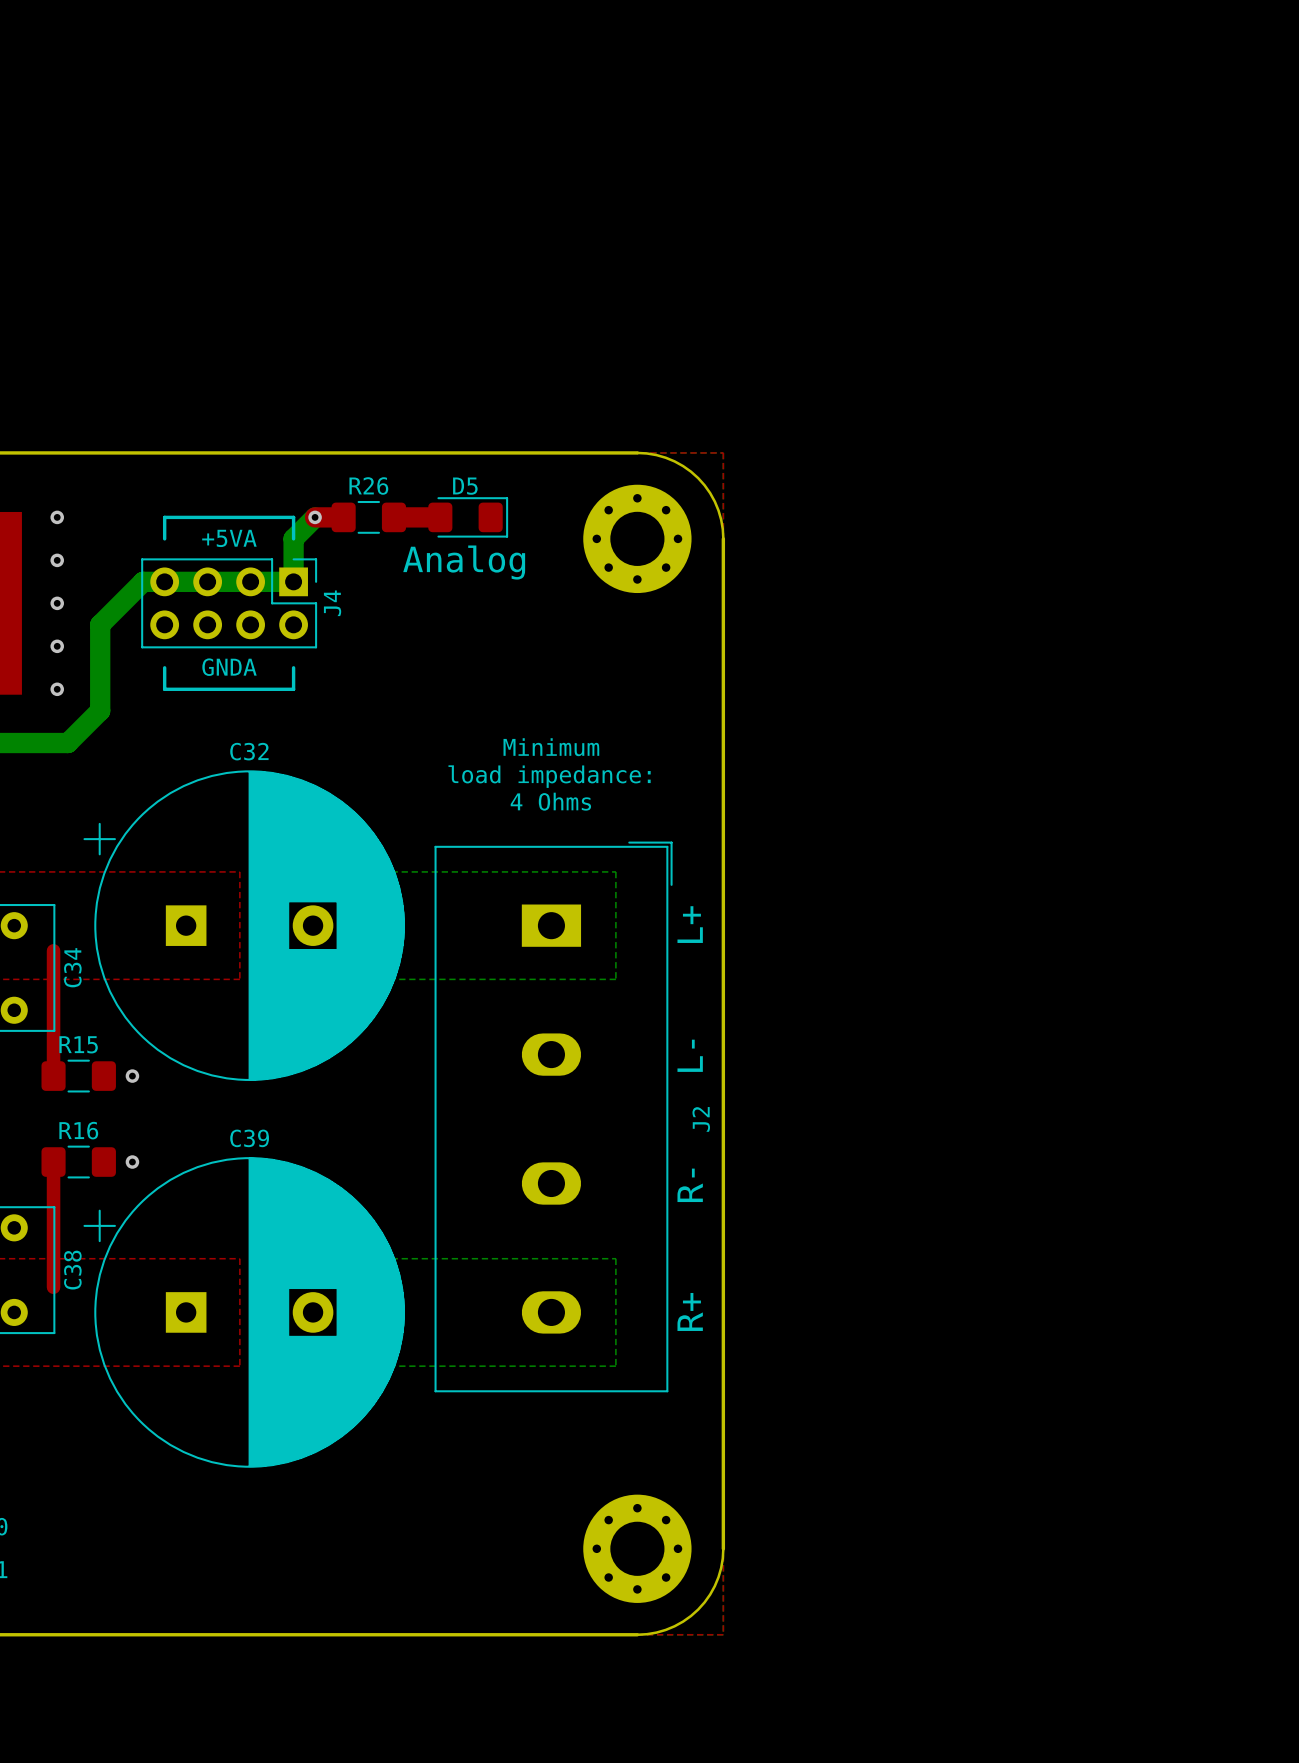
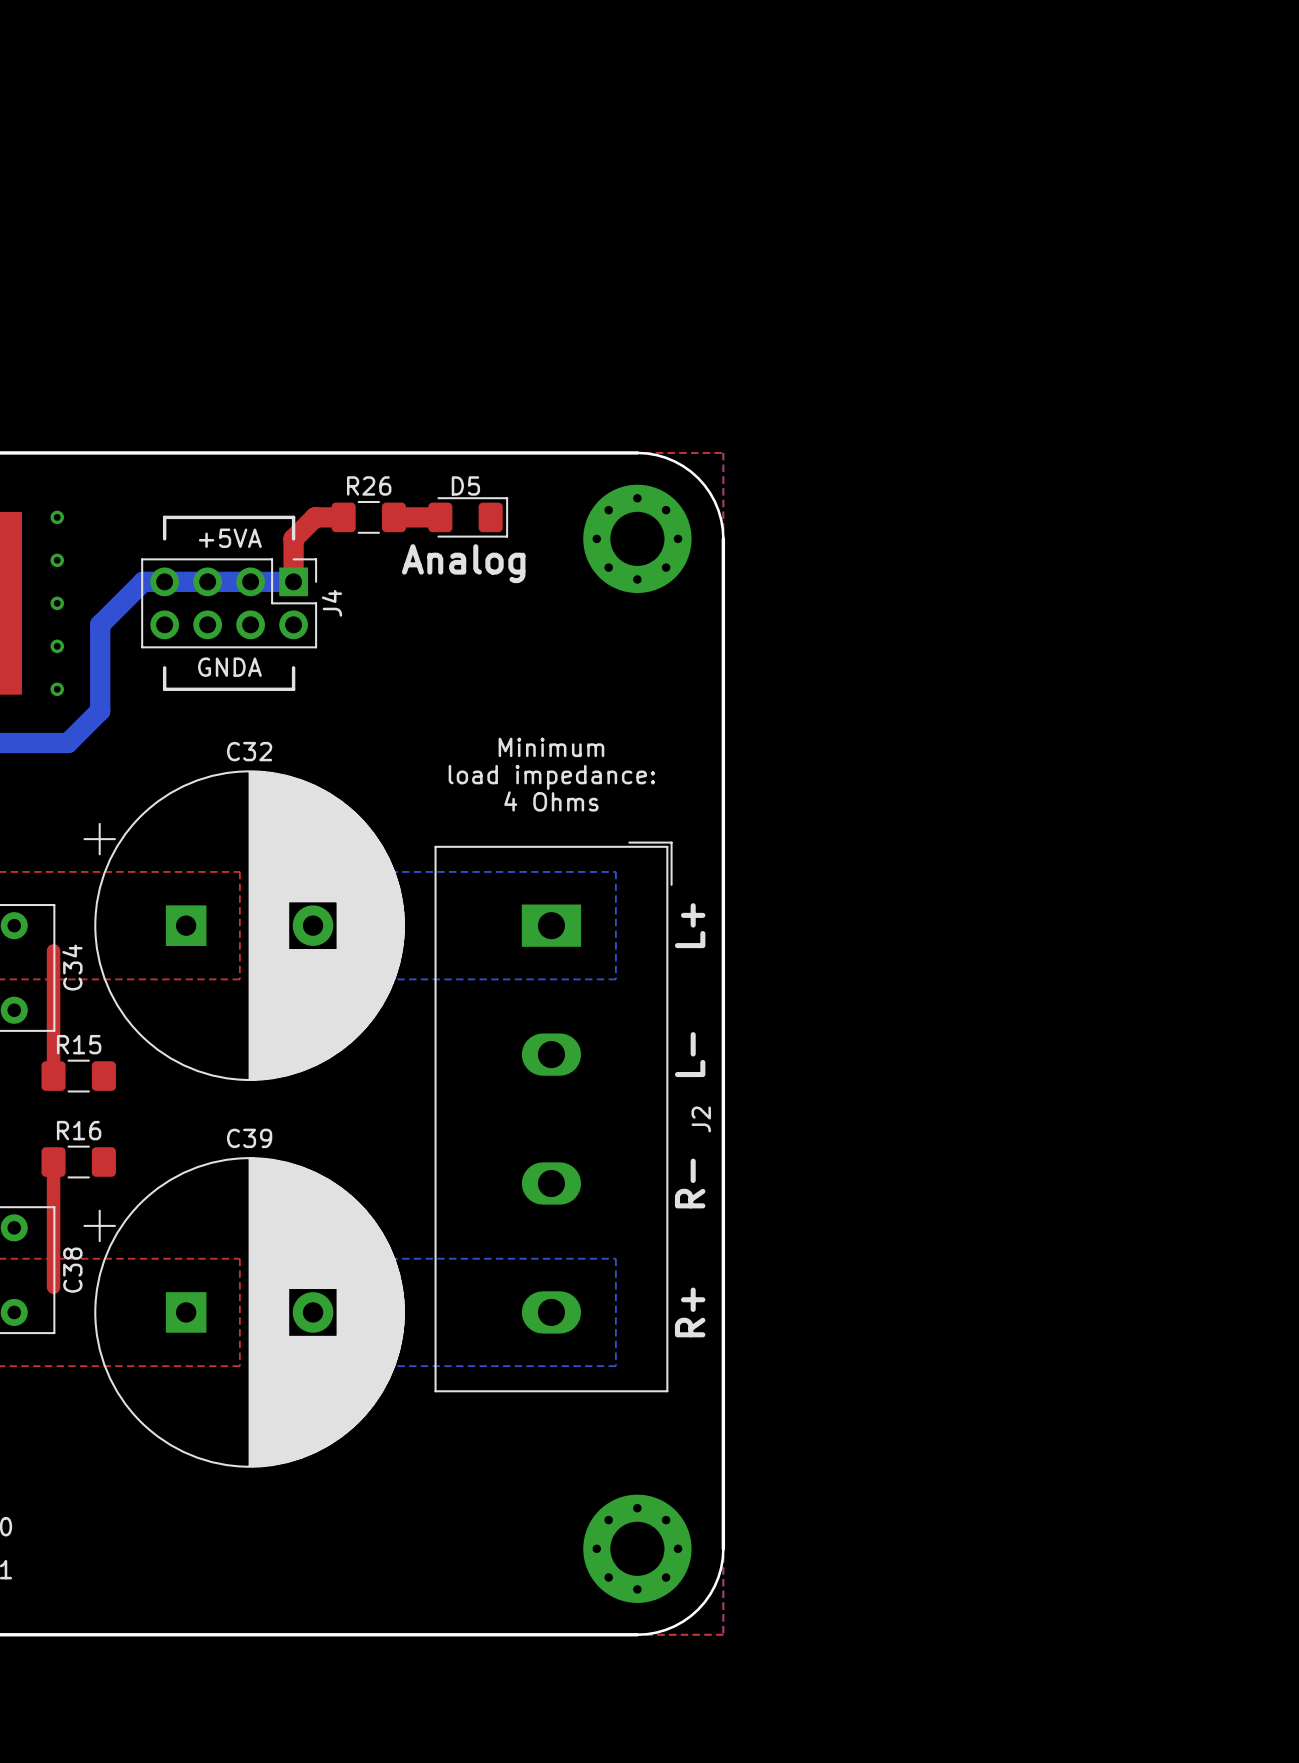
top track: none -> (315, 517) (293, 538) (293, 581)
bottom track: (315, 517) (293, 538) (293, 581) -> none
via: (315, 517) -> none
via: (132, 1076) -> none
via: (132, 1162) -> none

